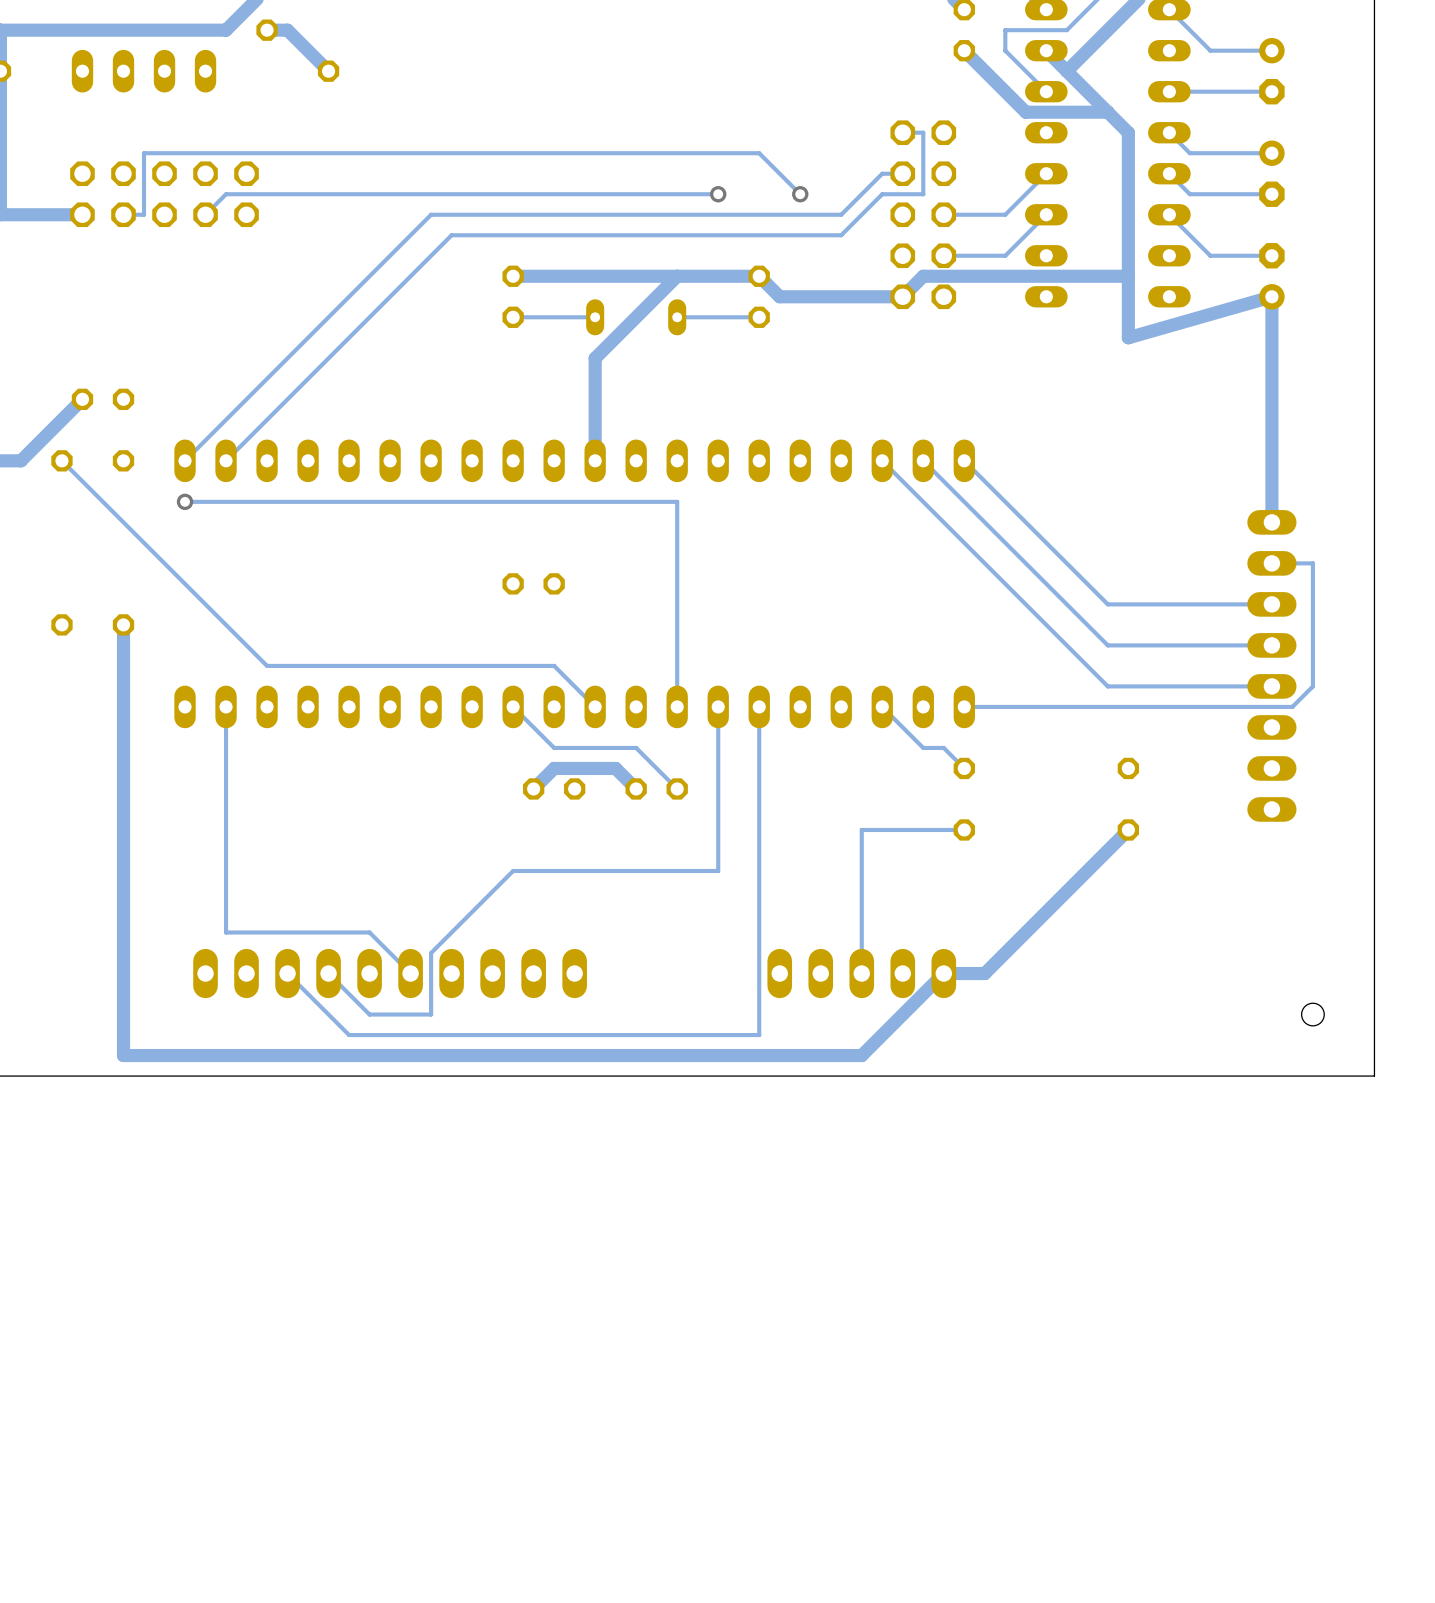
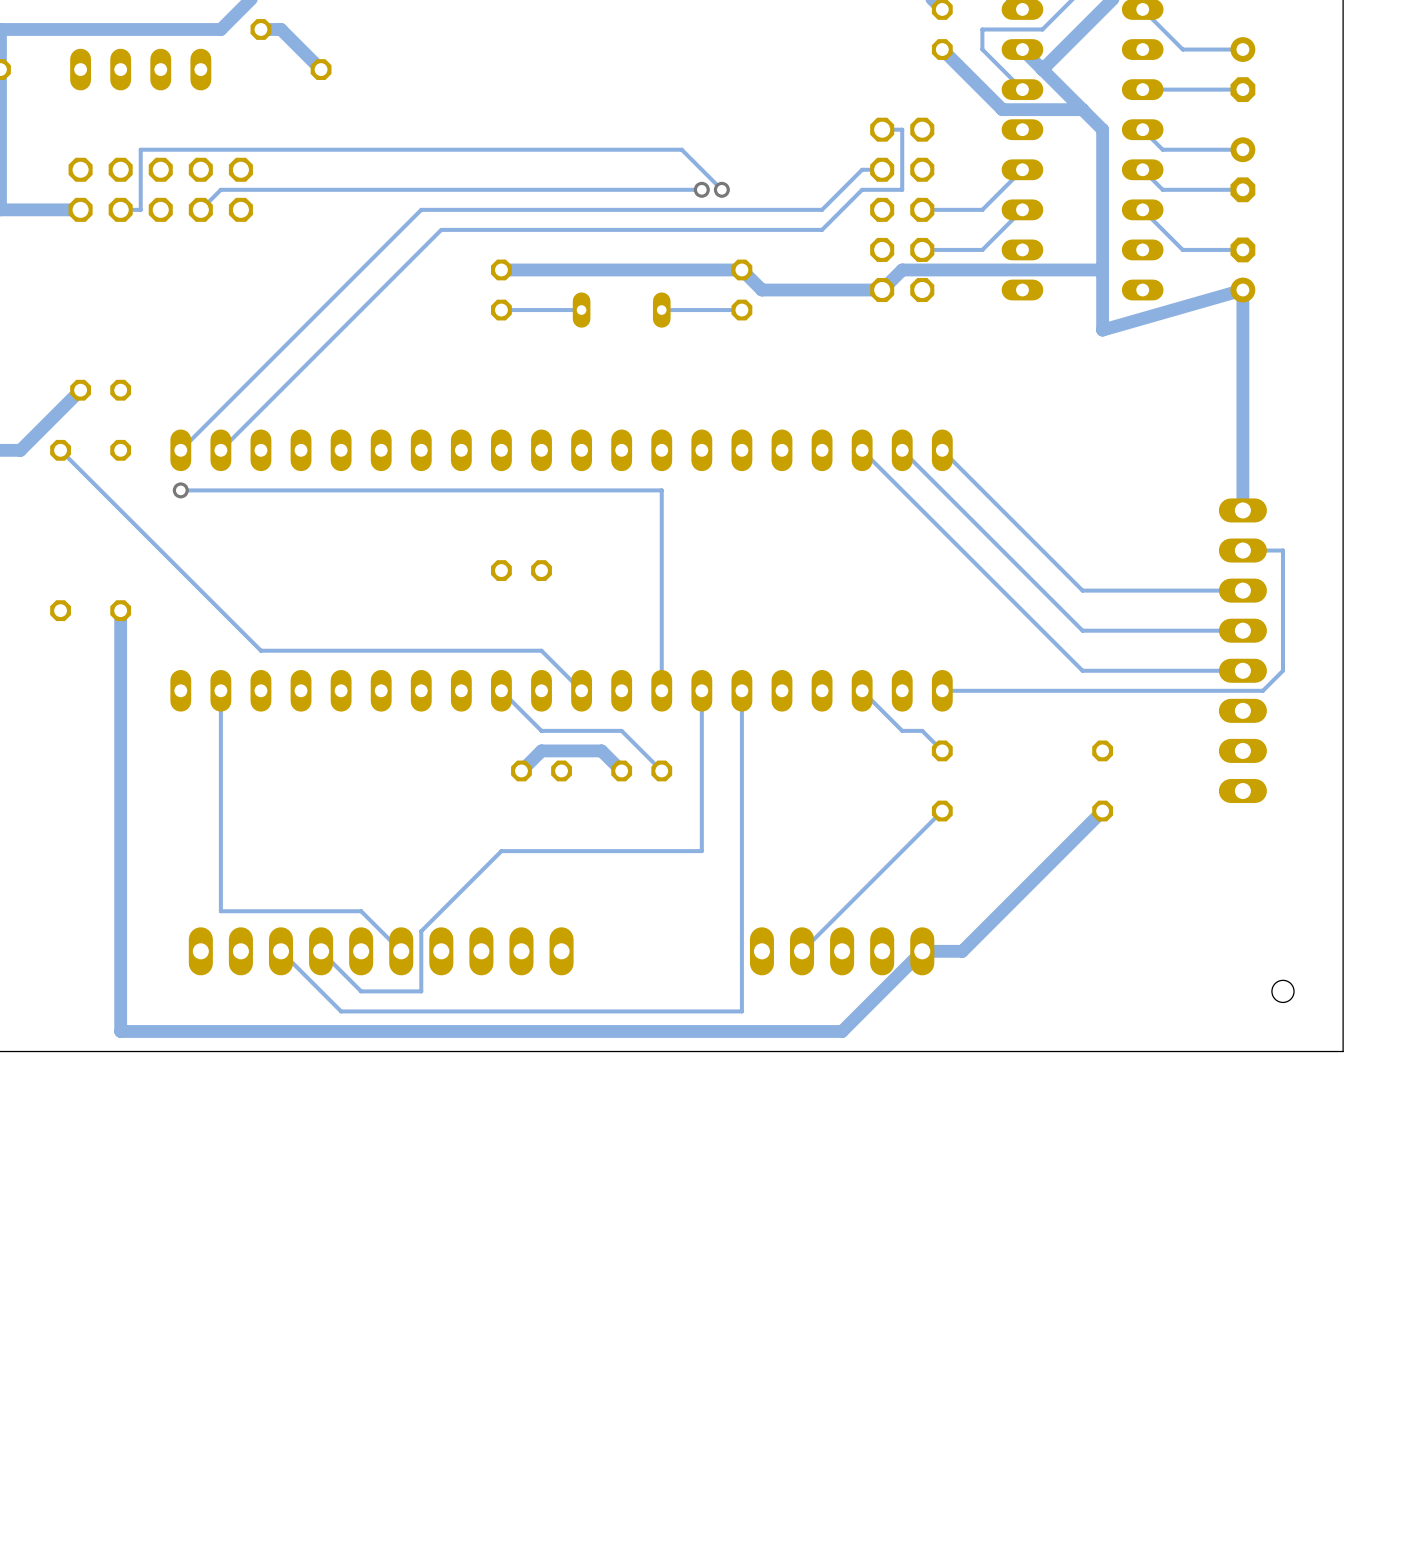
track: (697, 153) (759, 153) (800, 194) -> (681, 149) (721, 189)
via position: (800, 194) -> (721, 189)
track: (677, 276) (595, 358) (595, 460) -> none
track: (964, 829) (861, 829) (861, 973) -> (942, 811) (802, 951)

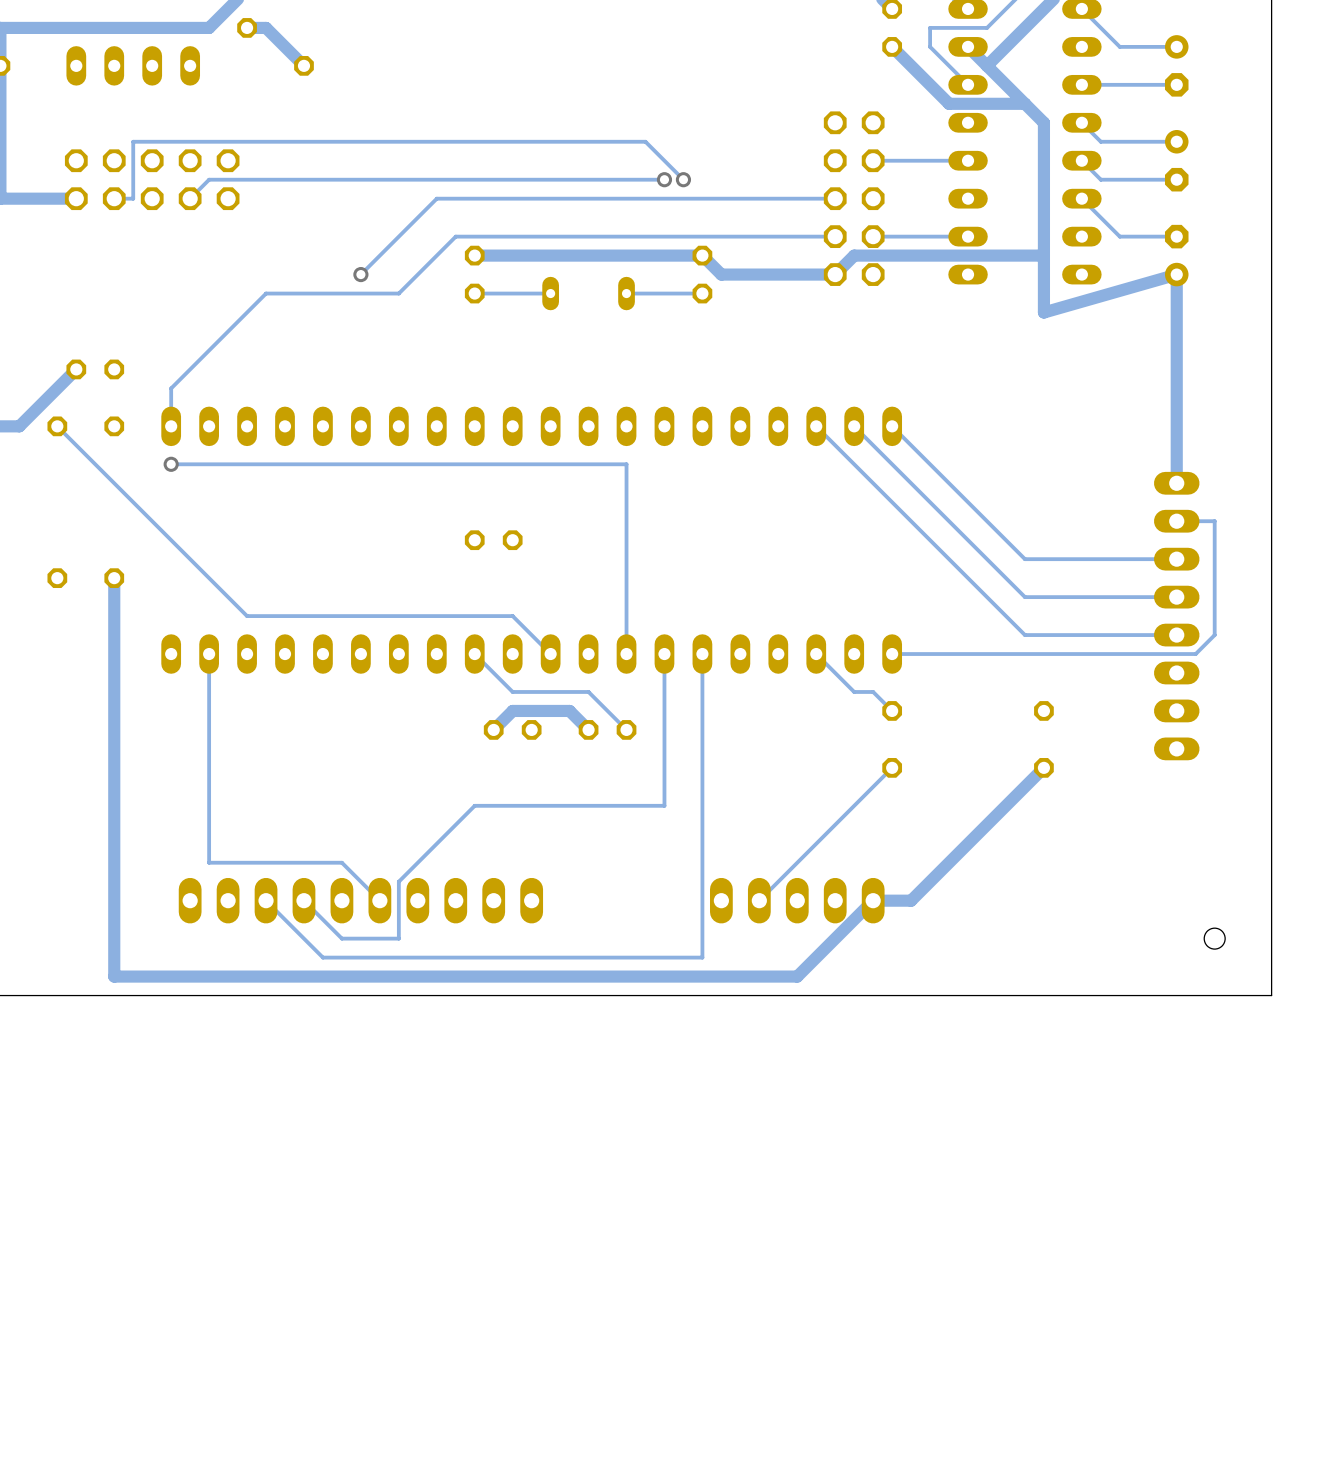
track: (882, 129) (902, 129) (902, 189) (862, 189) (822, 229) (441, 229) -> none
track: (882, 169) (862, 169) (822, 209) -> (835, 198) (778, 198)
track: (1022, 169) (982, 209) (922, 209) -> (968, 160) (873, 160)
track: (461, 209) (421, 209) (180, 450) -> (436, 198) (417, 217)
track: (1022, 209) (982, 249) -> (968, 236) (930, 236)
track: none -> (835, 236) (455, 236) (398, 293) (266, 293) (171, 388) (171, 426)
track: (381, 290) (220, 450) -> none
via: none -> (360, 274)

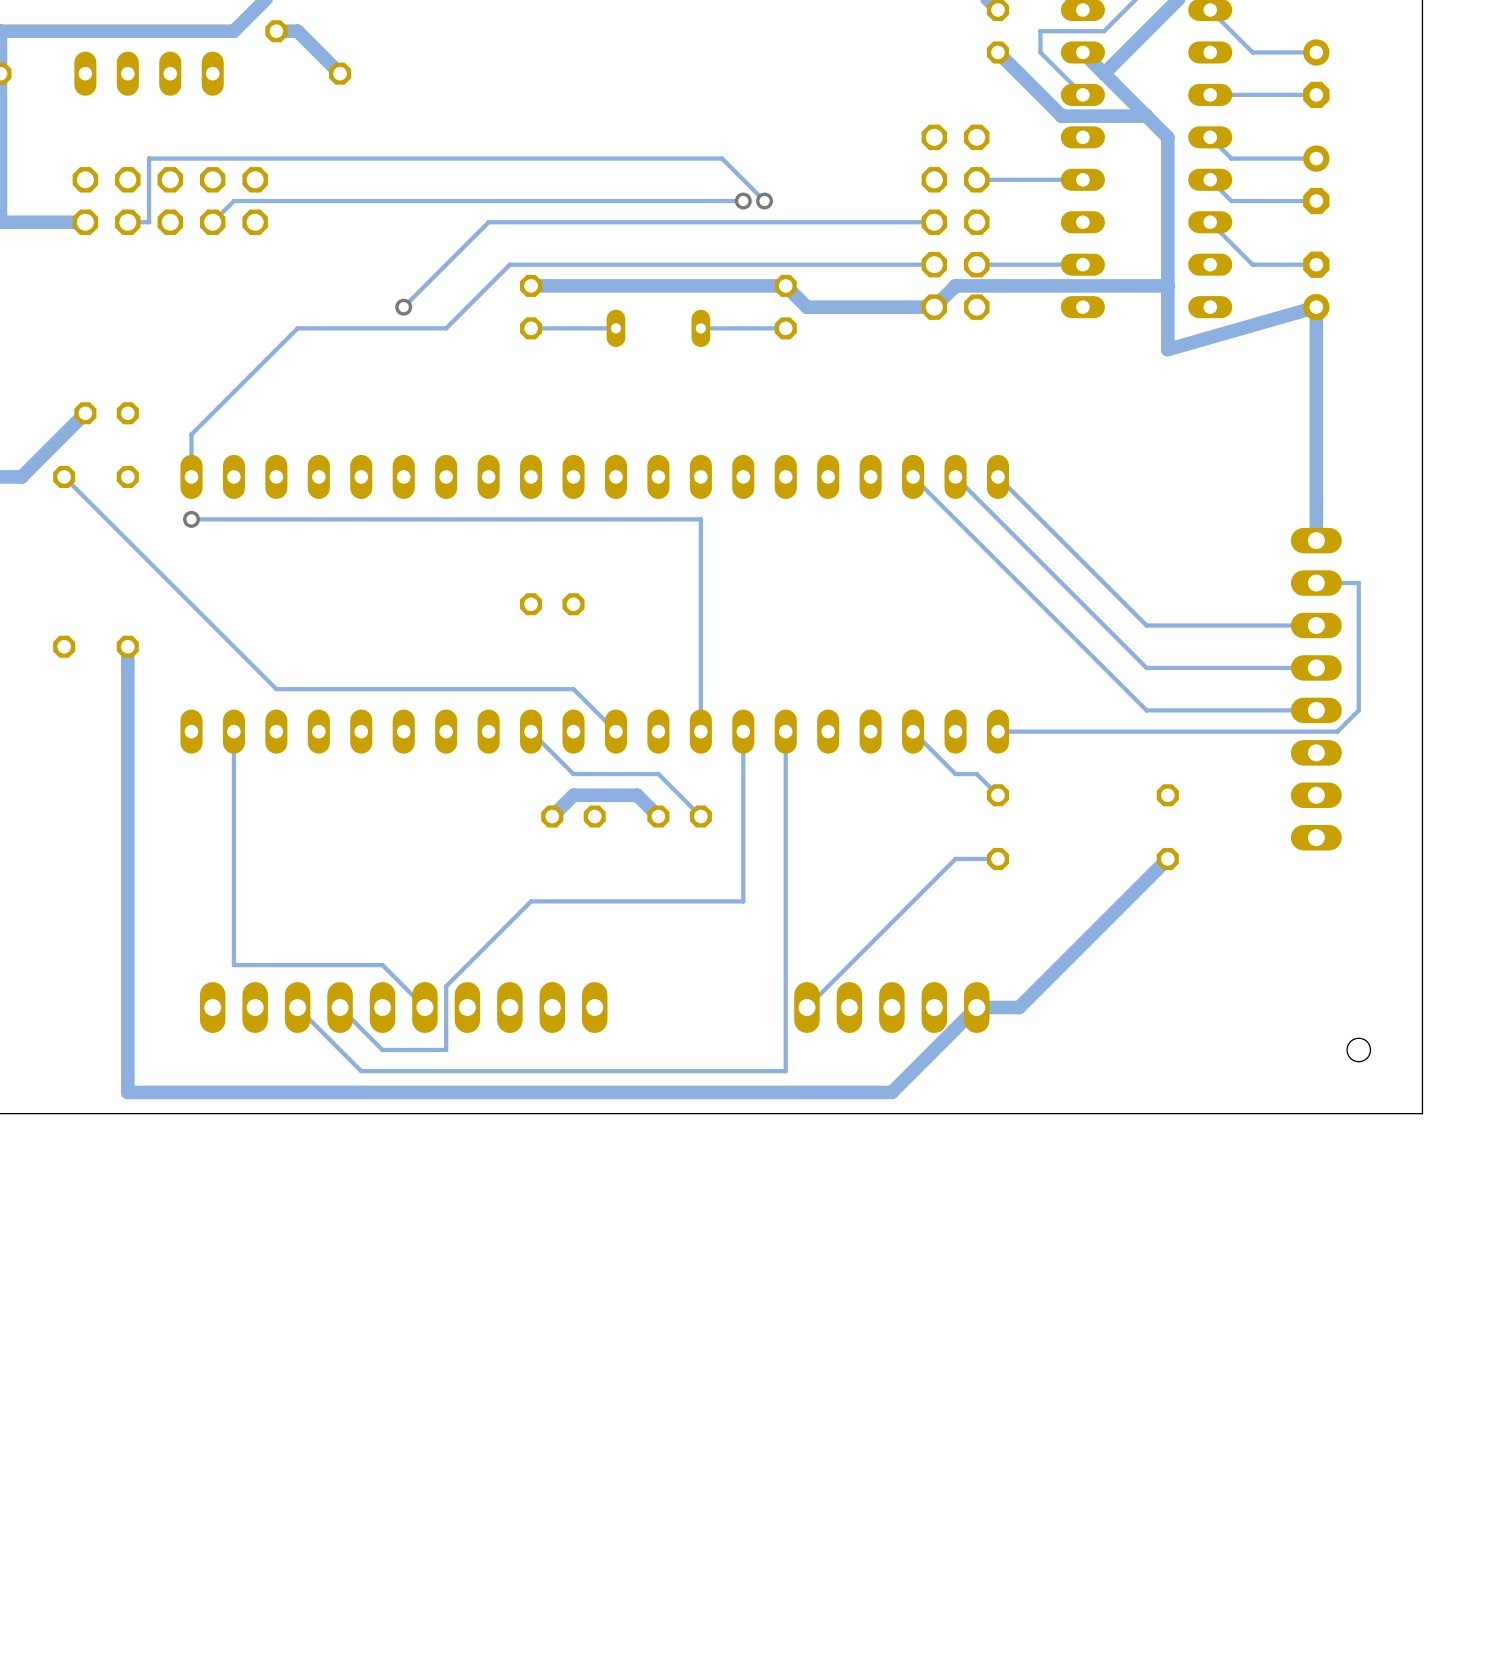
track: (892, 767) (759, 900) -> (997, 858) (955, 858) (806, 1007)

